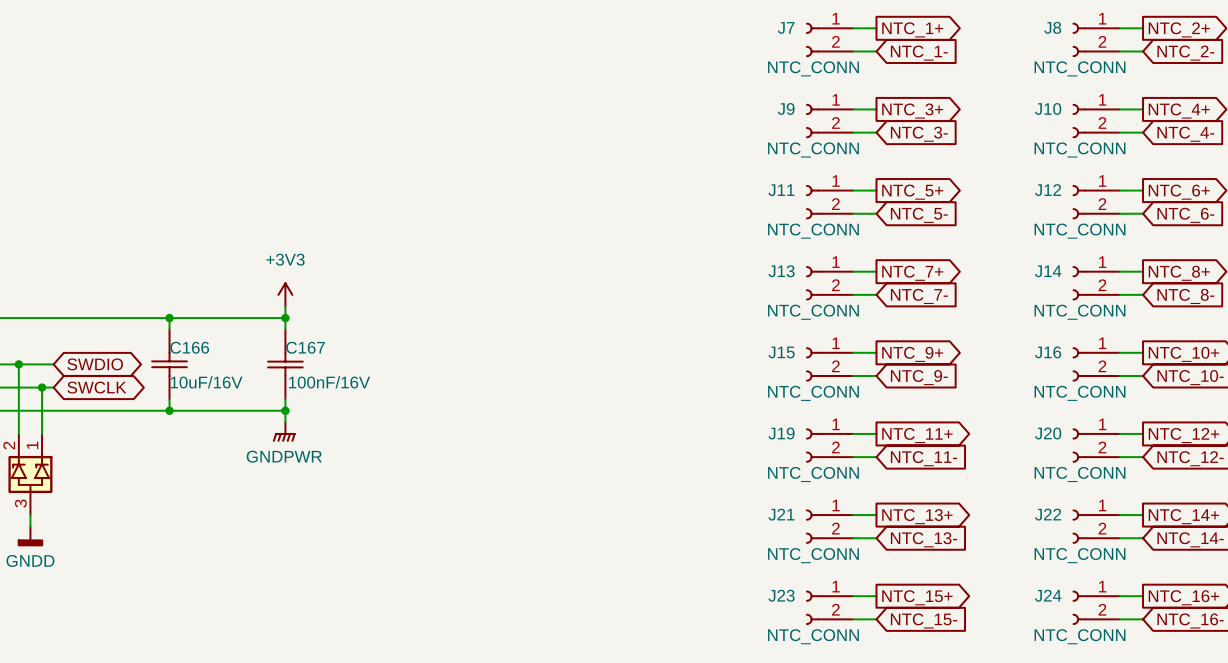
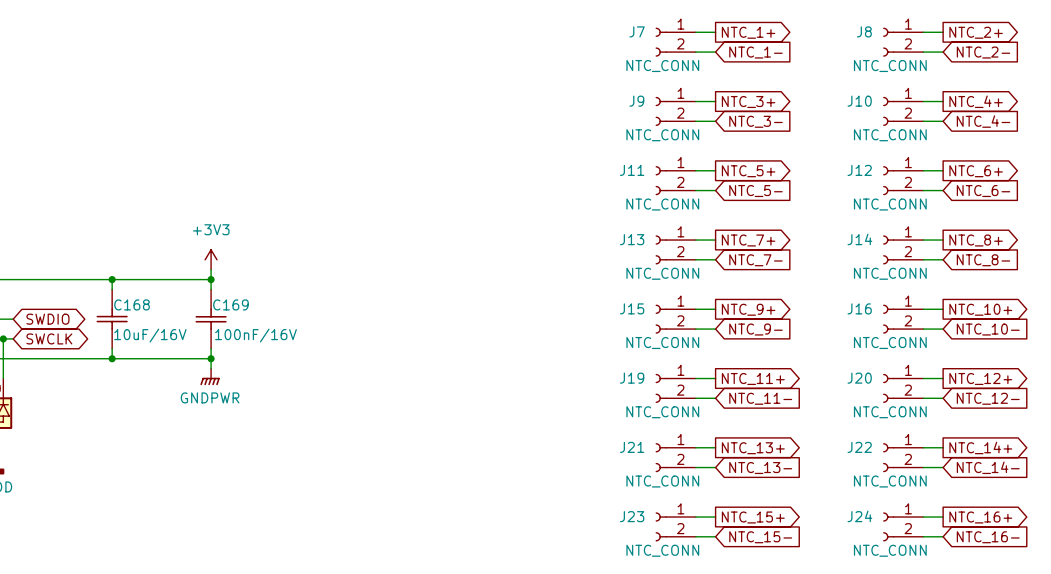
C166 name: C166 (189, 347) -> C168 (132, 304)
C167 name: C167 (305, 347) -> C169 (230, 304)

